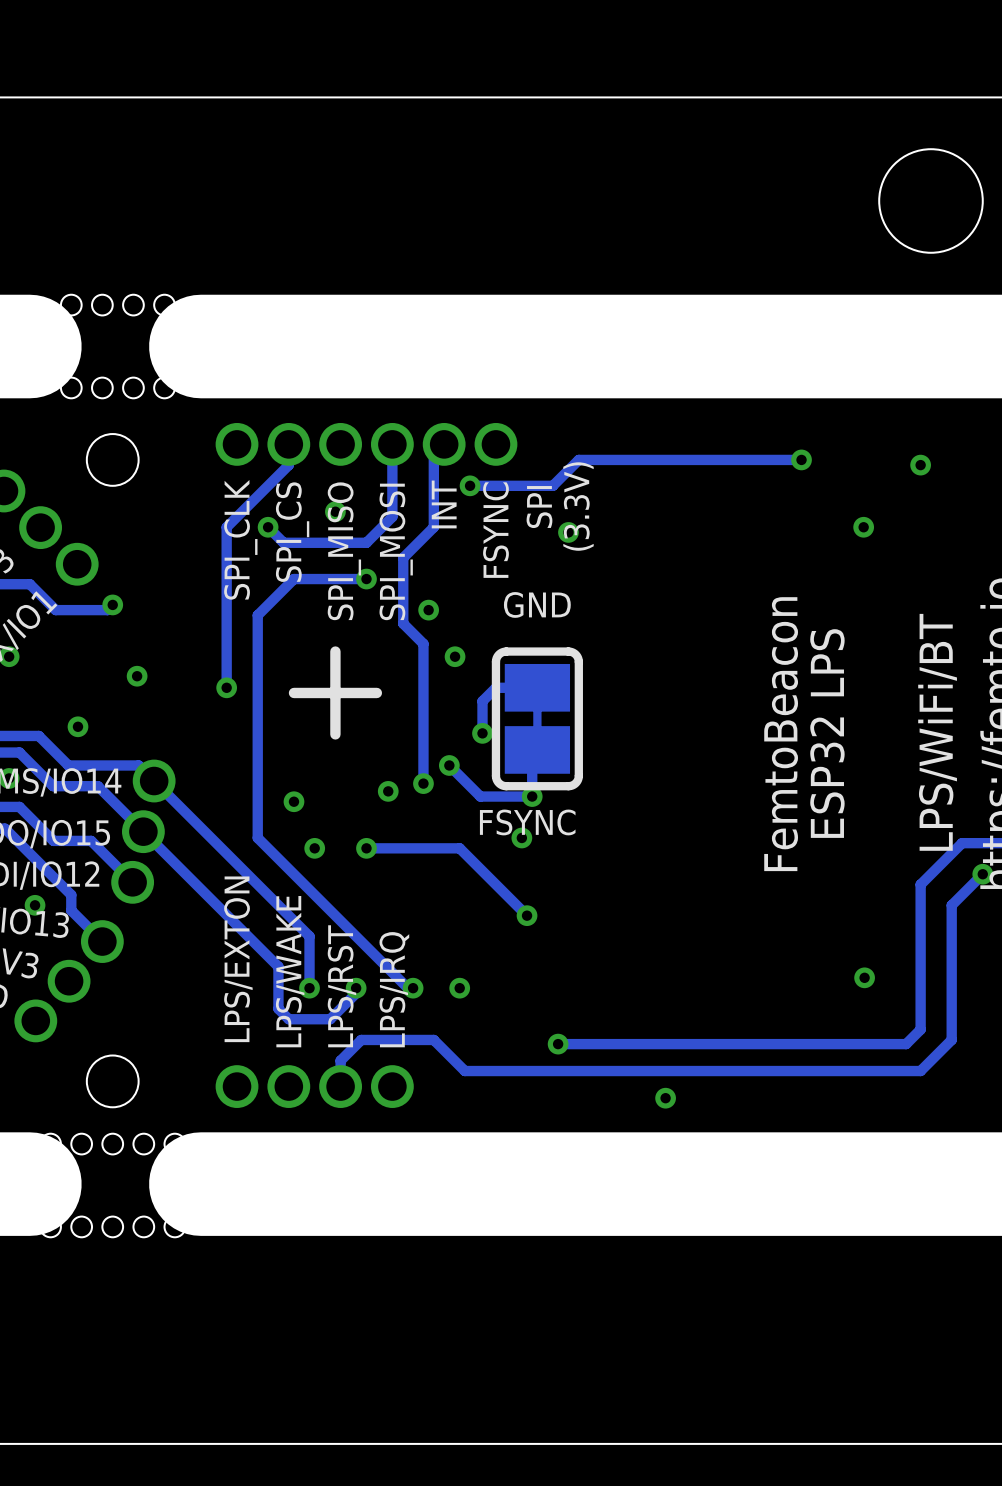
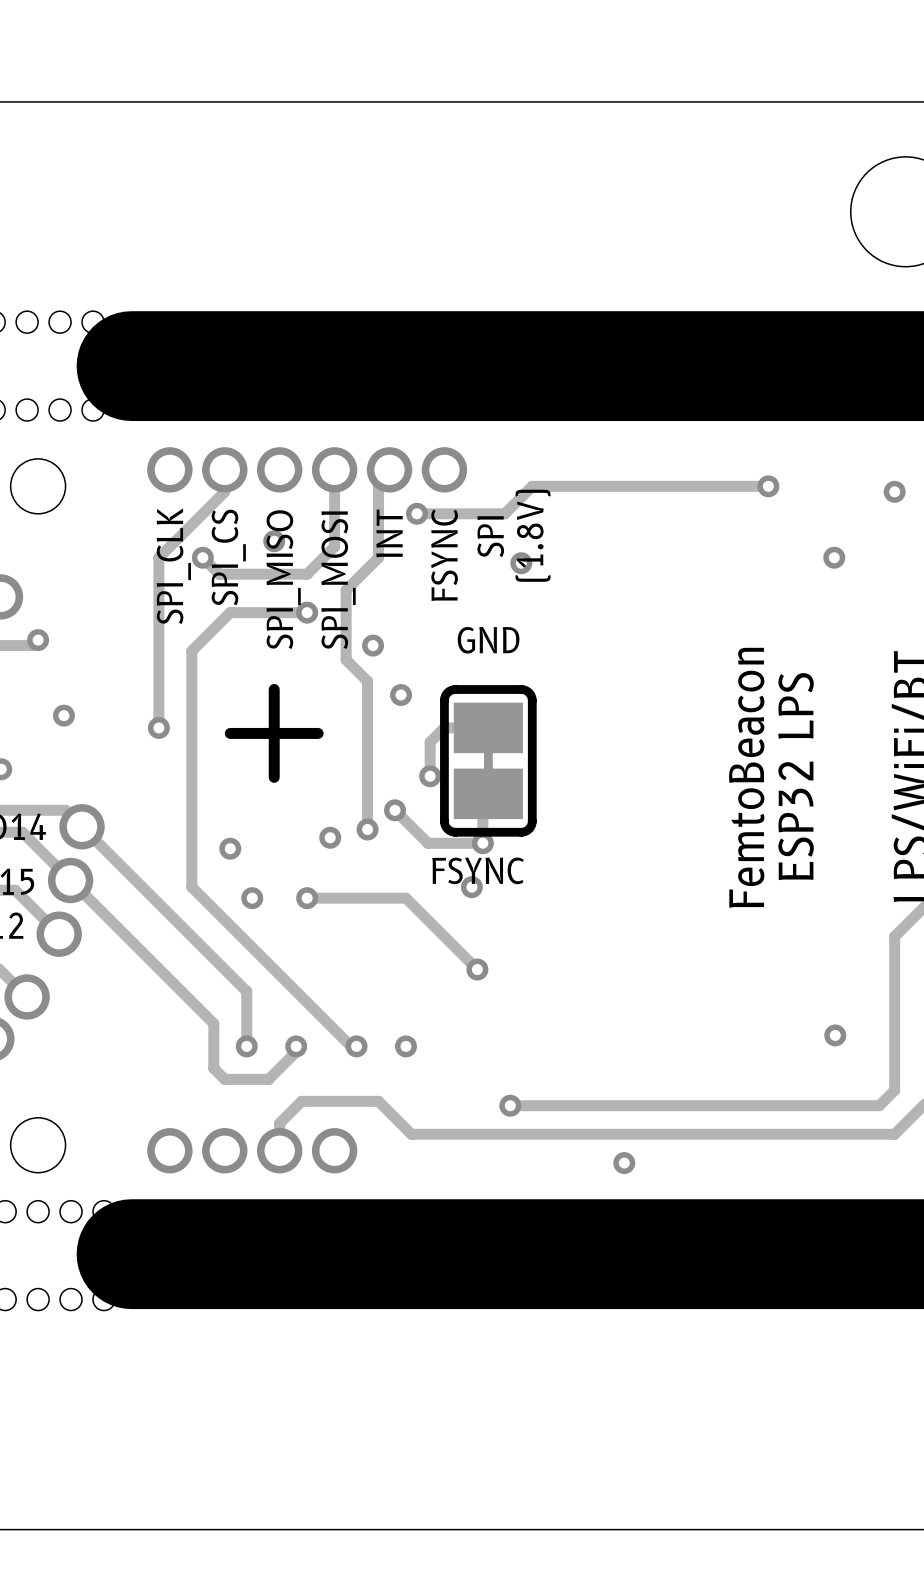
text: (3.3V) (578, 506) -> (1.8V) (533, 535)
text: LPS/EXTON (238, 959) -> none
text: LPS/WAKE (290, 971) -> none
text: LPS/RST (341, 986) -> none
text: LPS/IRQ (394, 989) -> none

